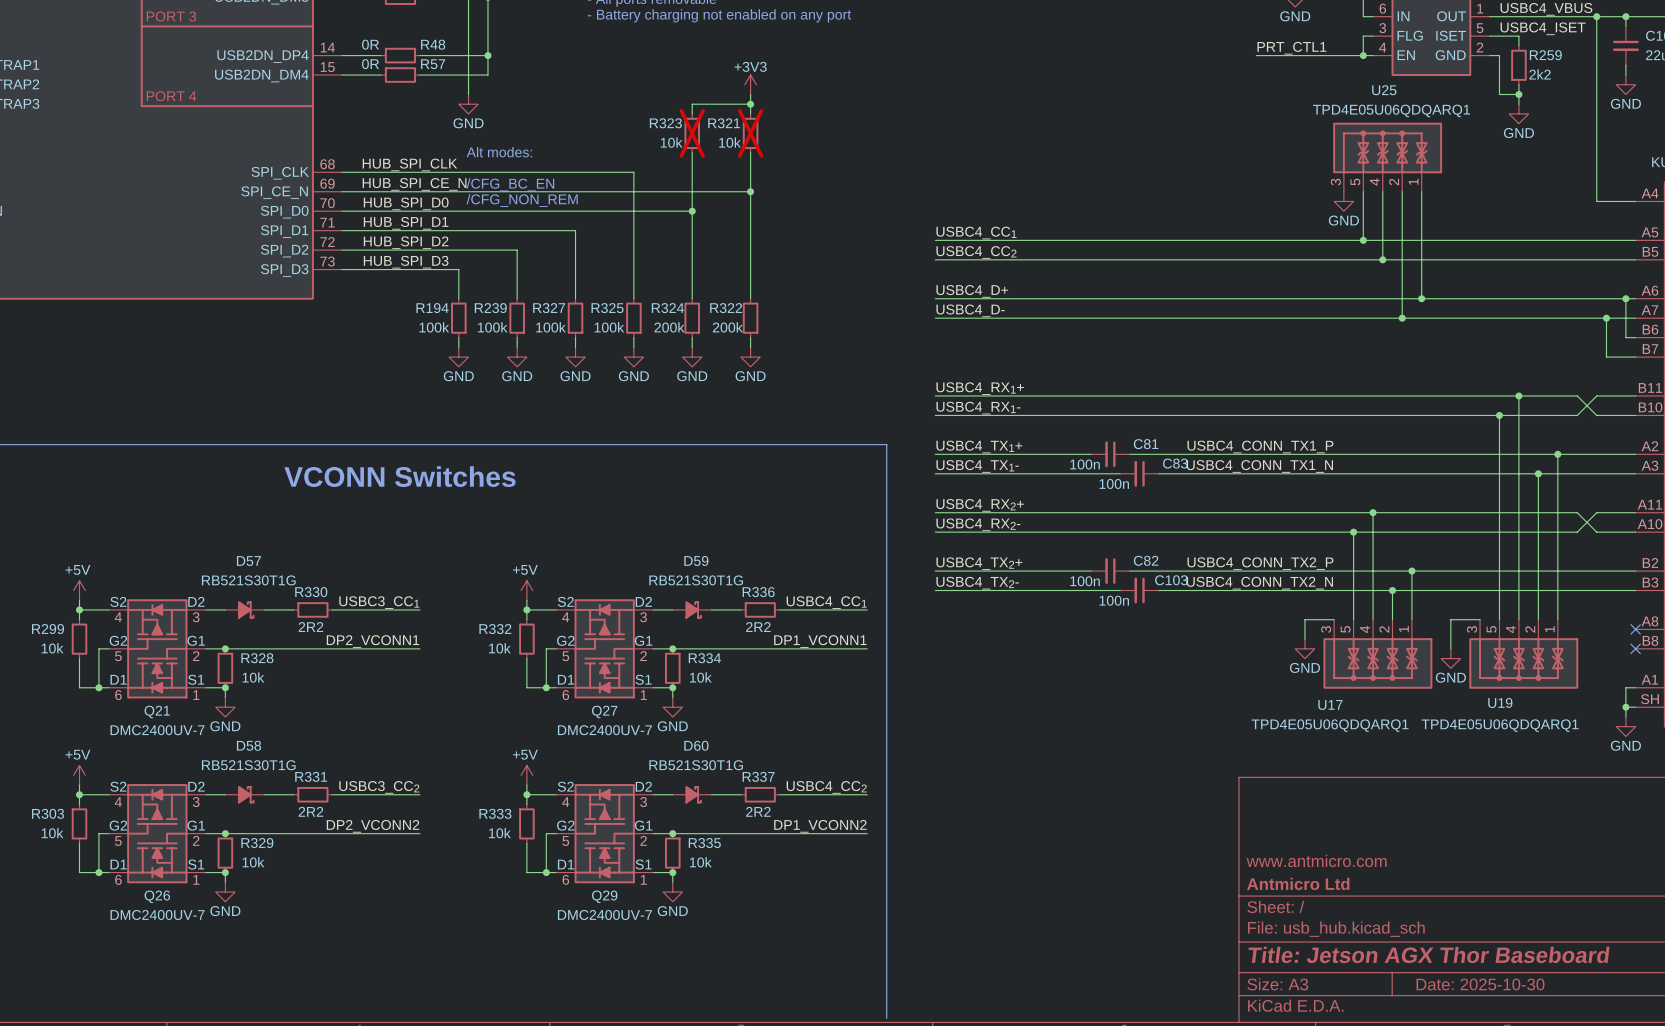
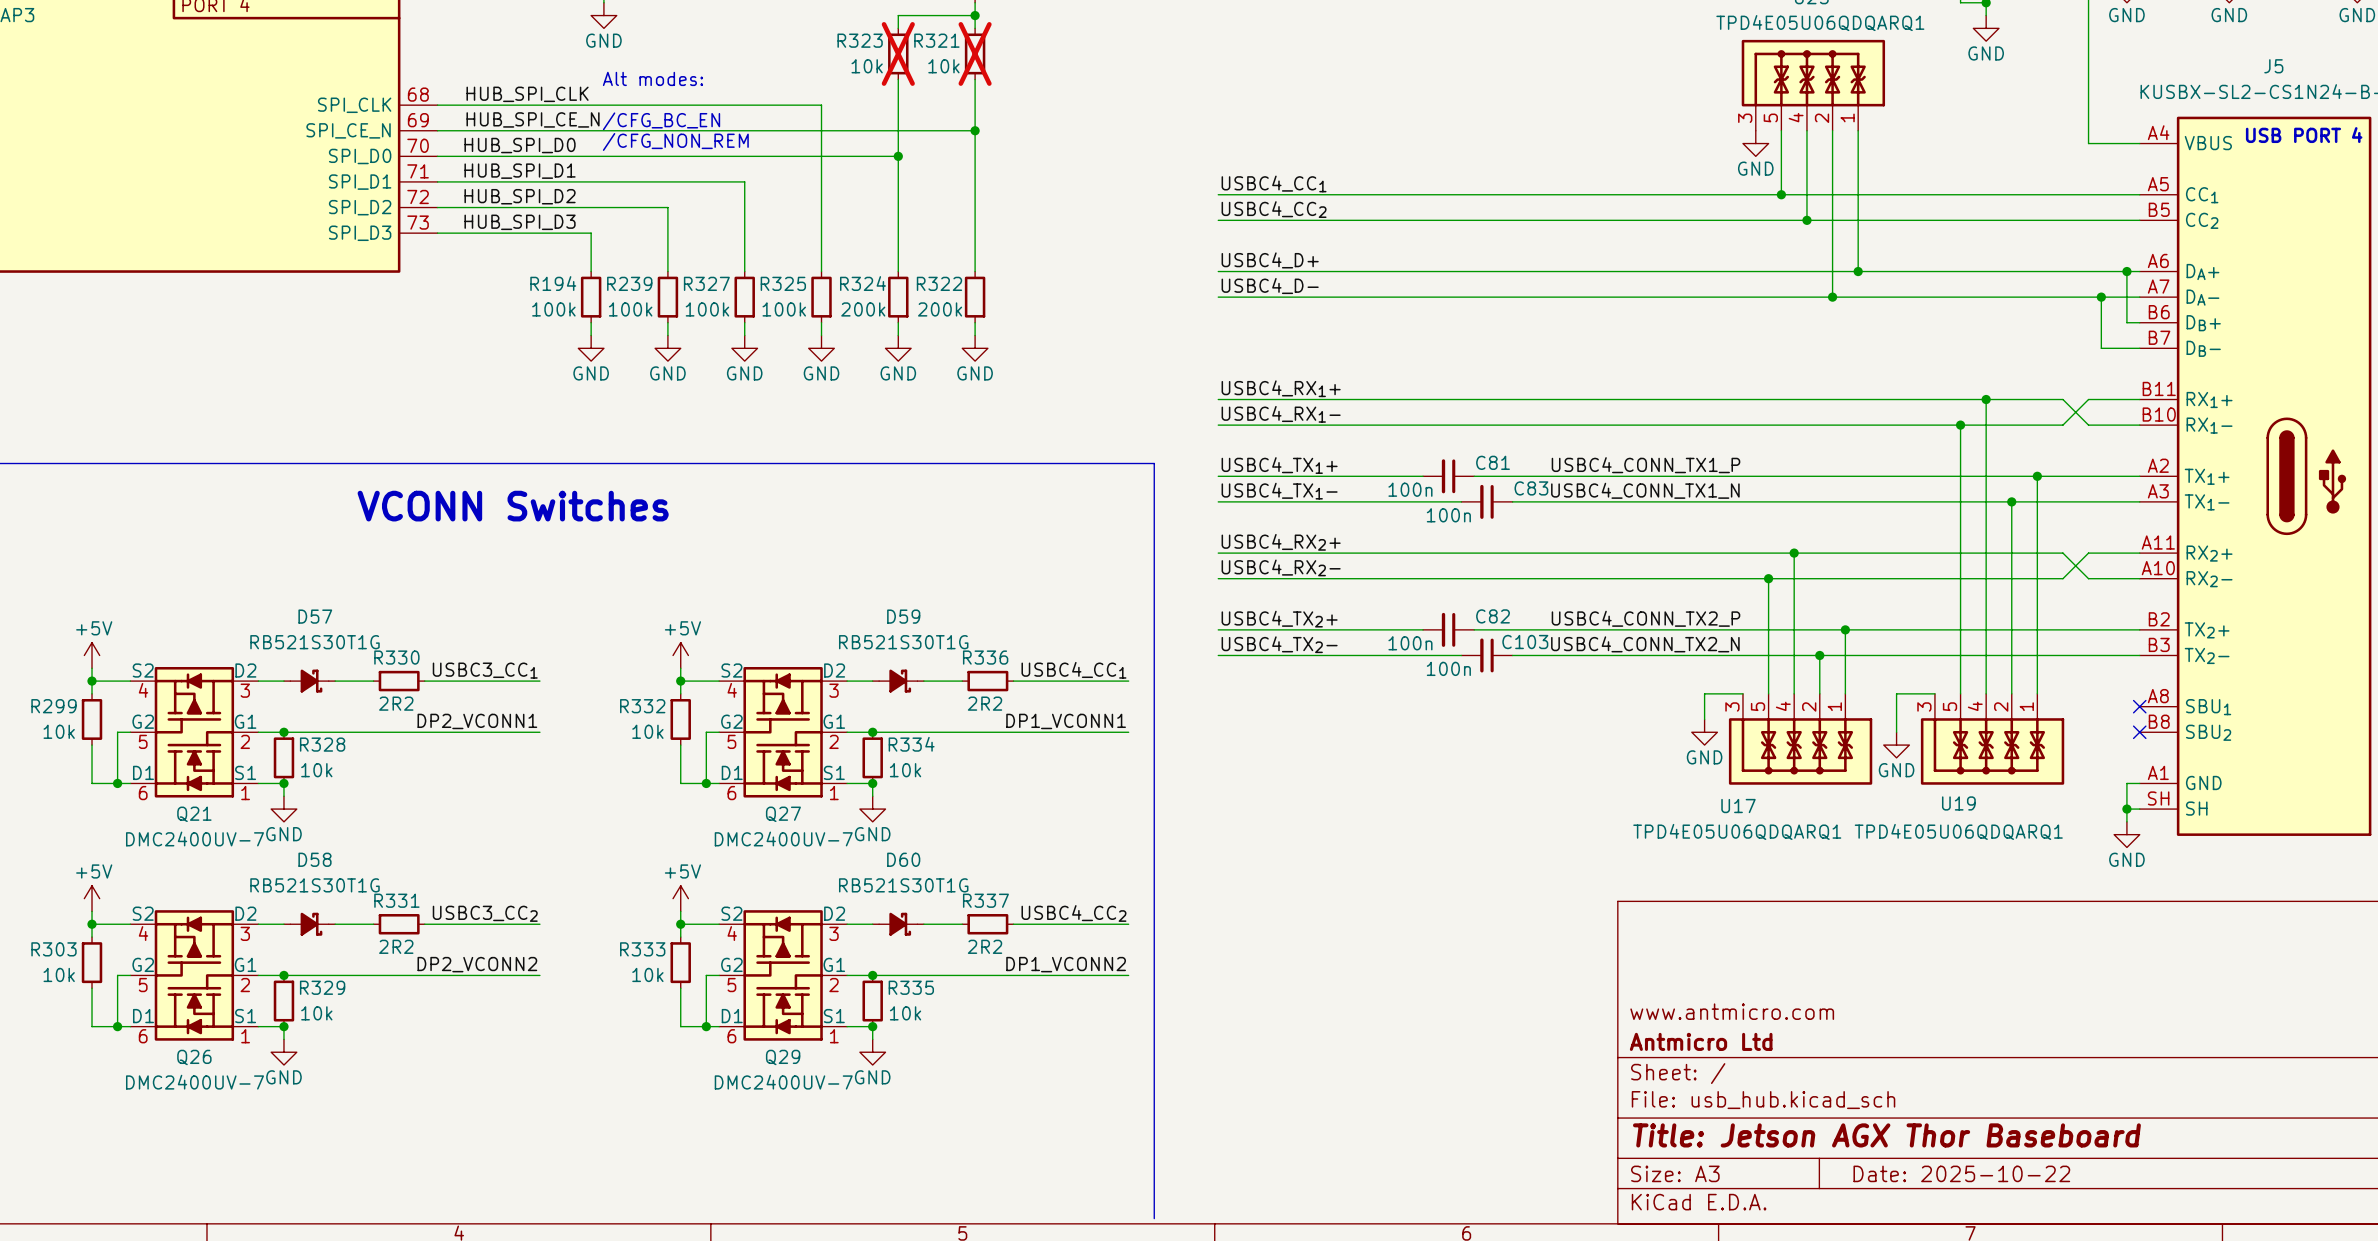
title block: Date: 2025-10-30 (1480, 984) -> Date: 2025-10-22 (1961, 1173)

